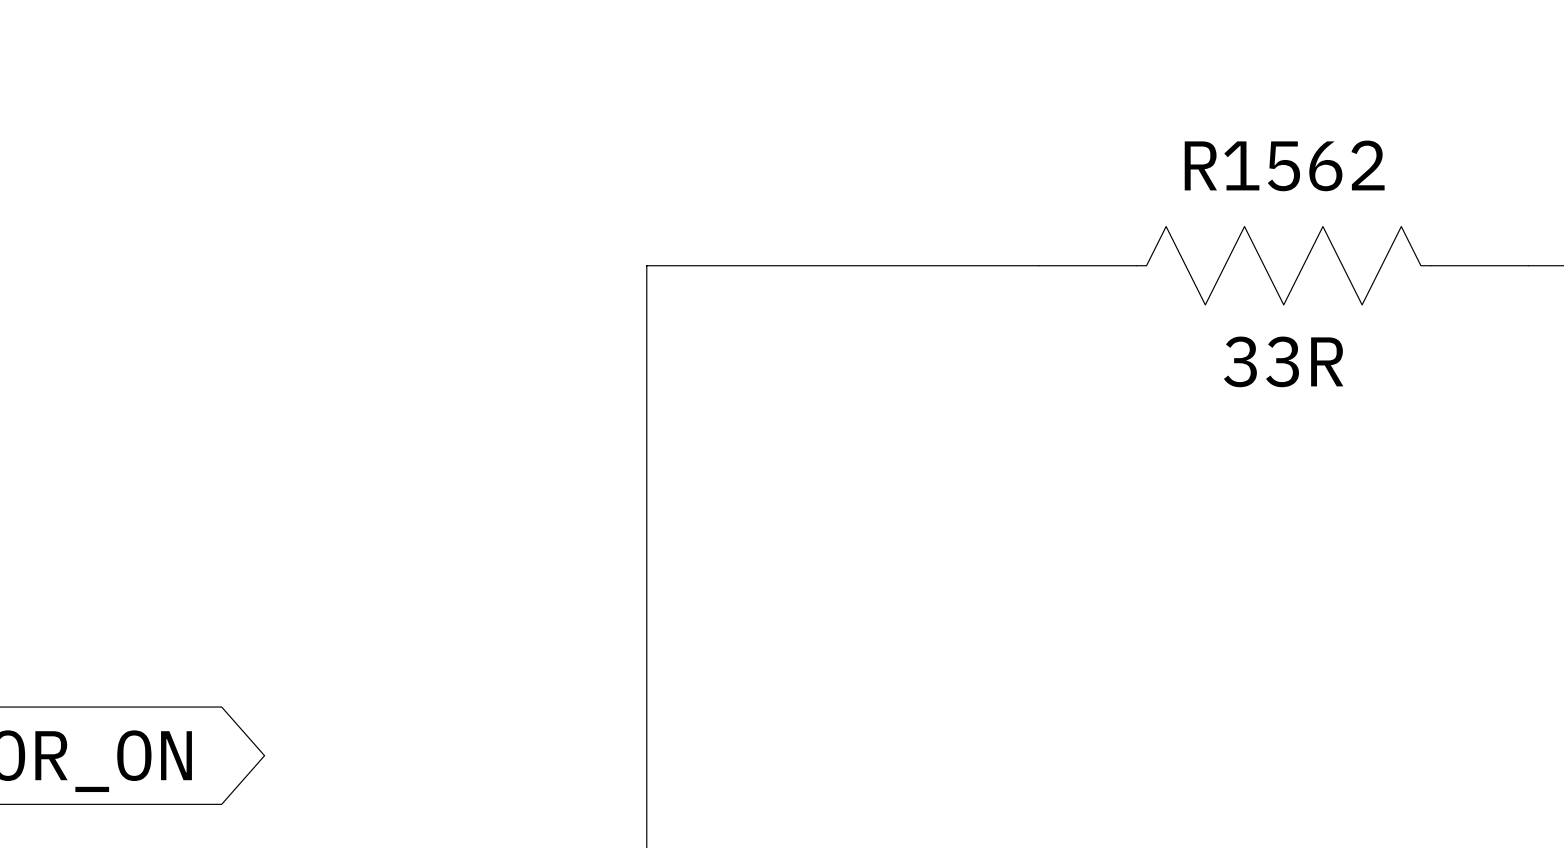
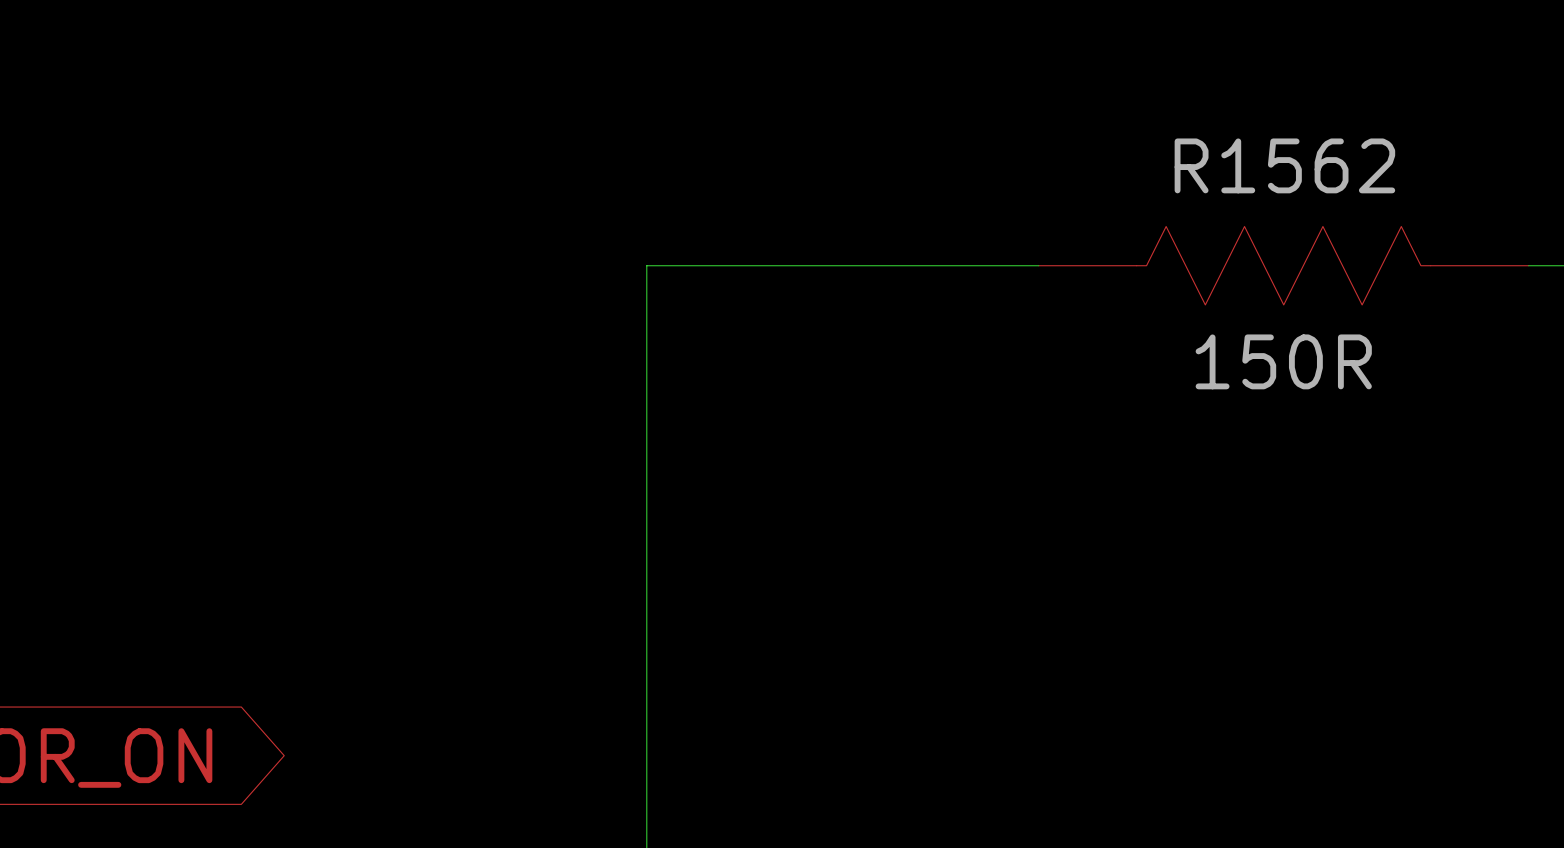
R1562 value: 33R (1283, 361) -> 150R (1283, 361)

